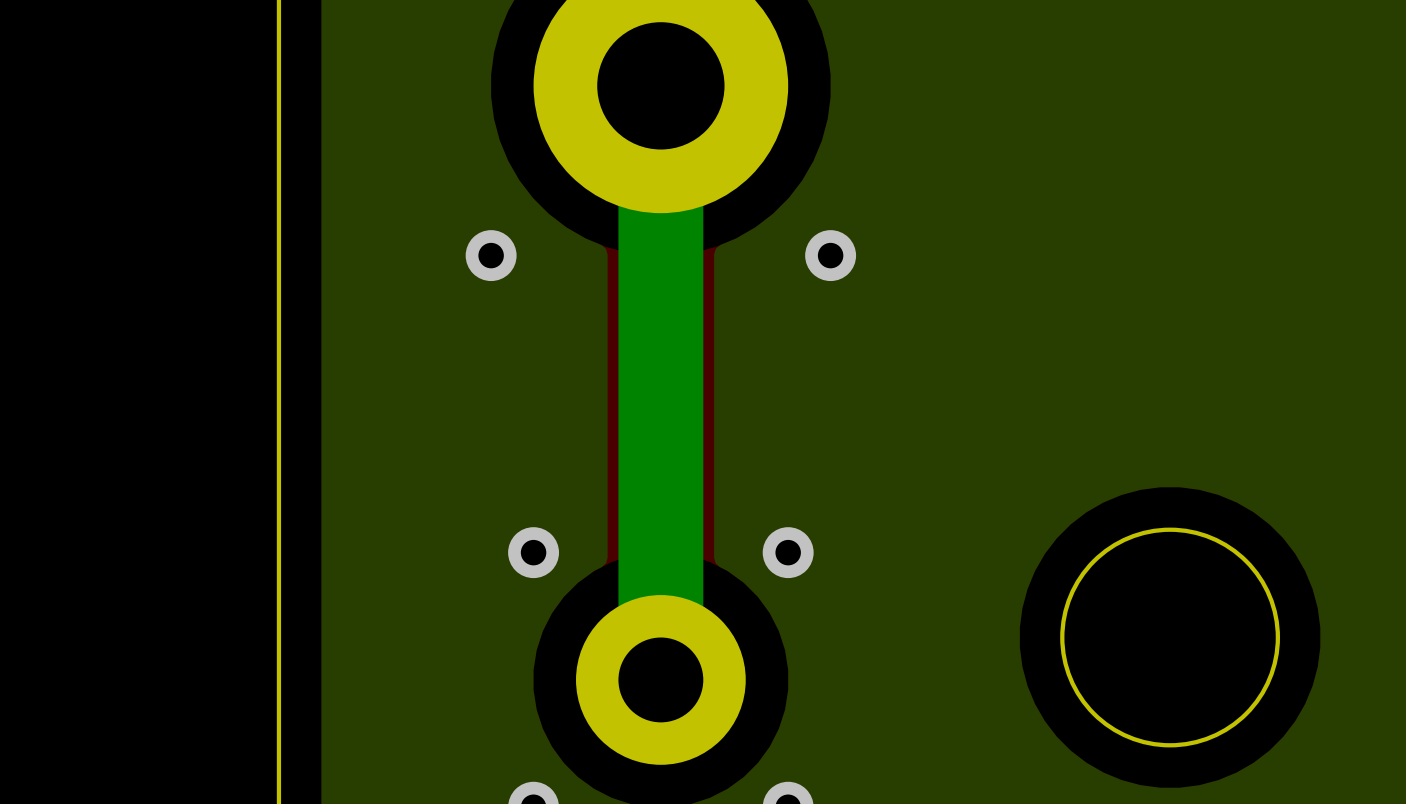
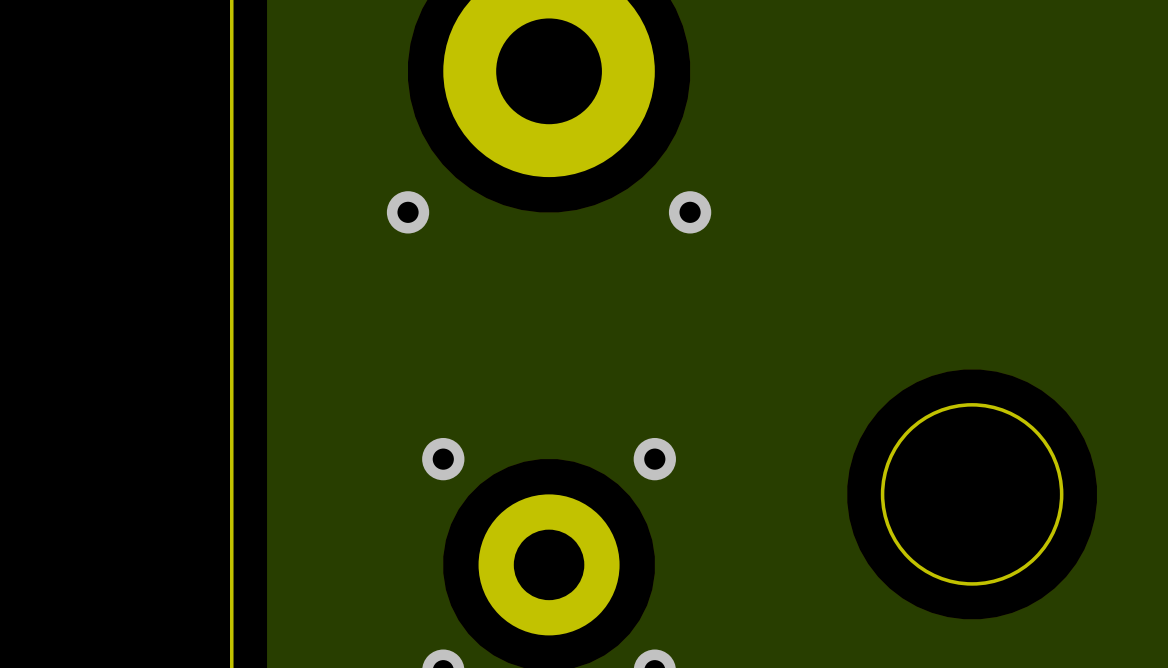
bottom track: (660, 85) (660, 679) -> none
round board edge position: (1170, 637) -> (972, 494)

